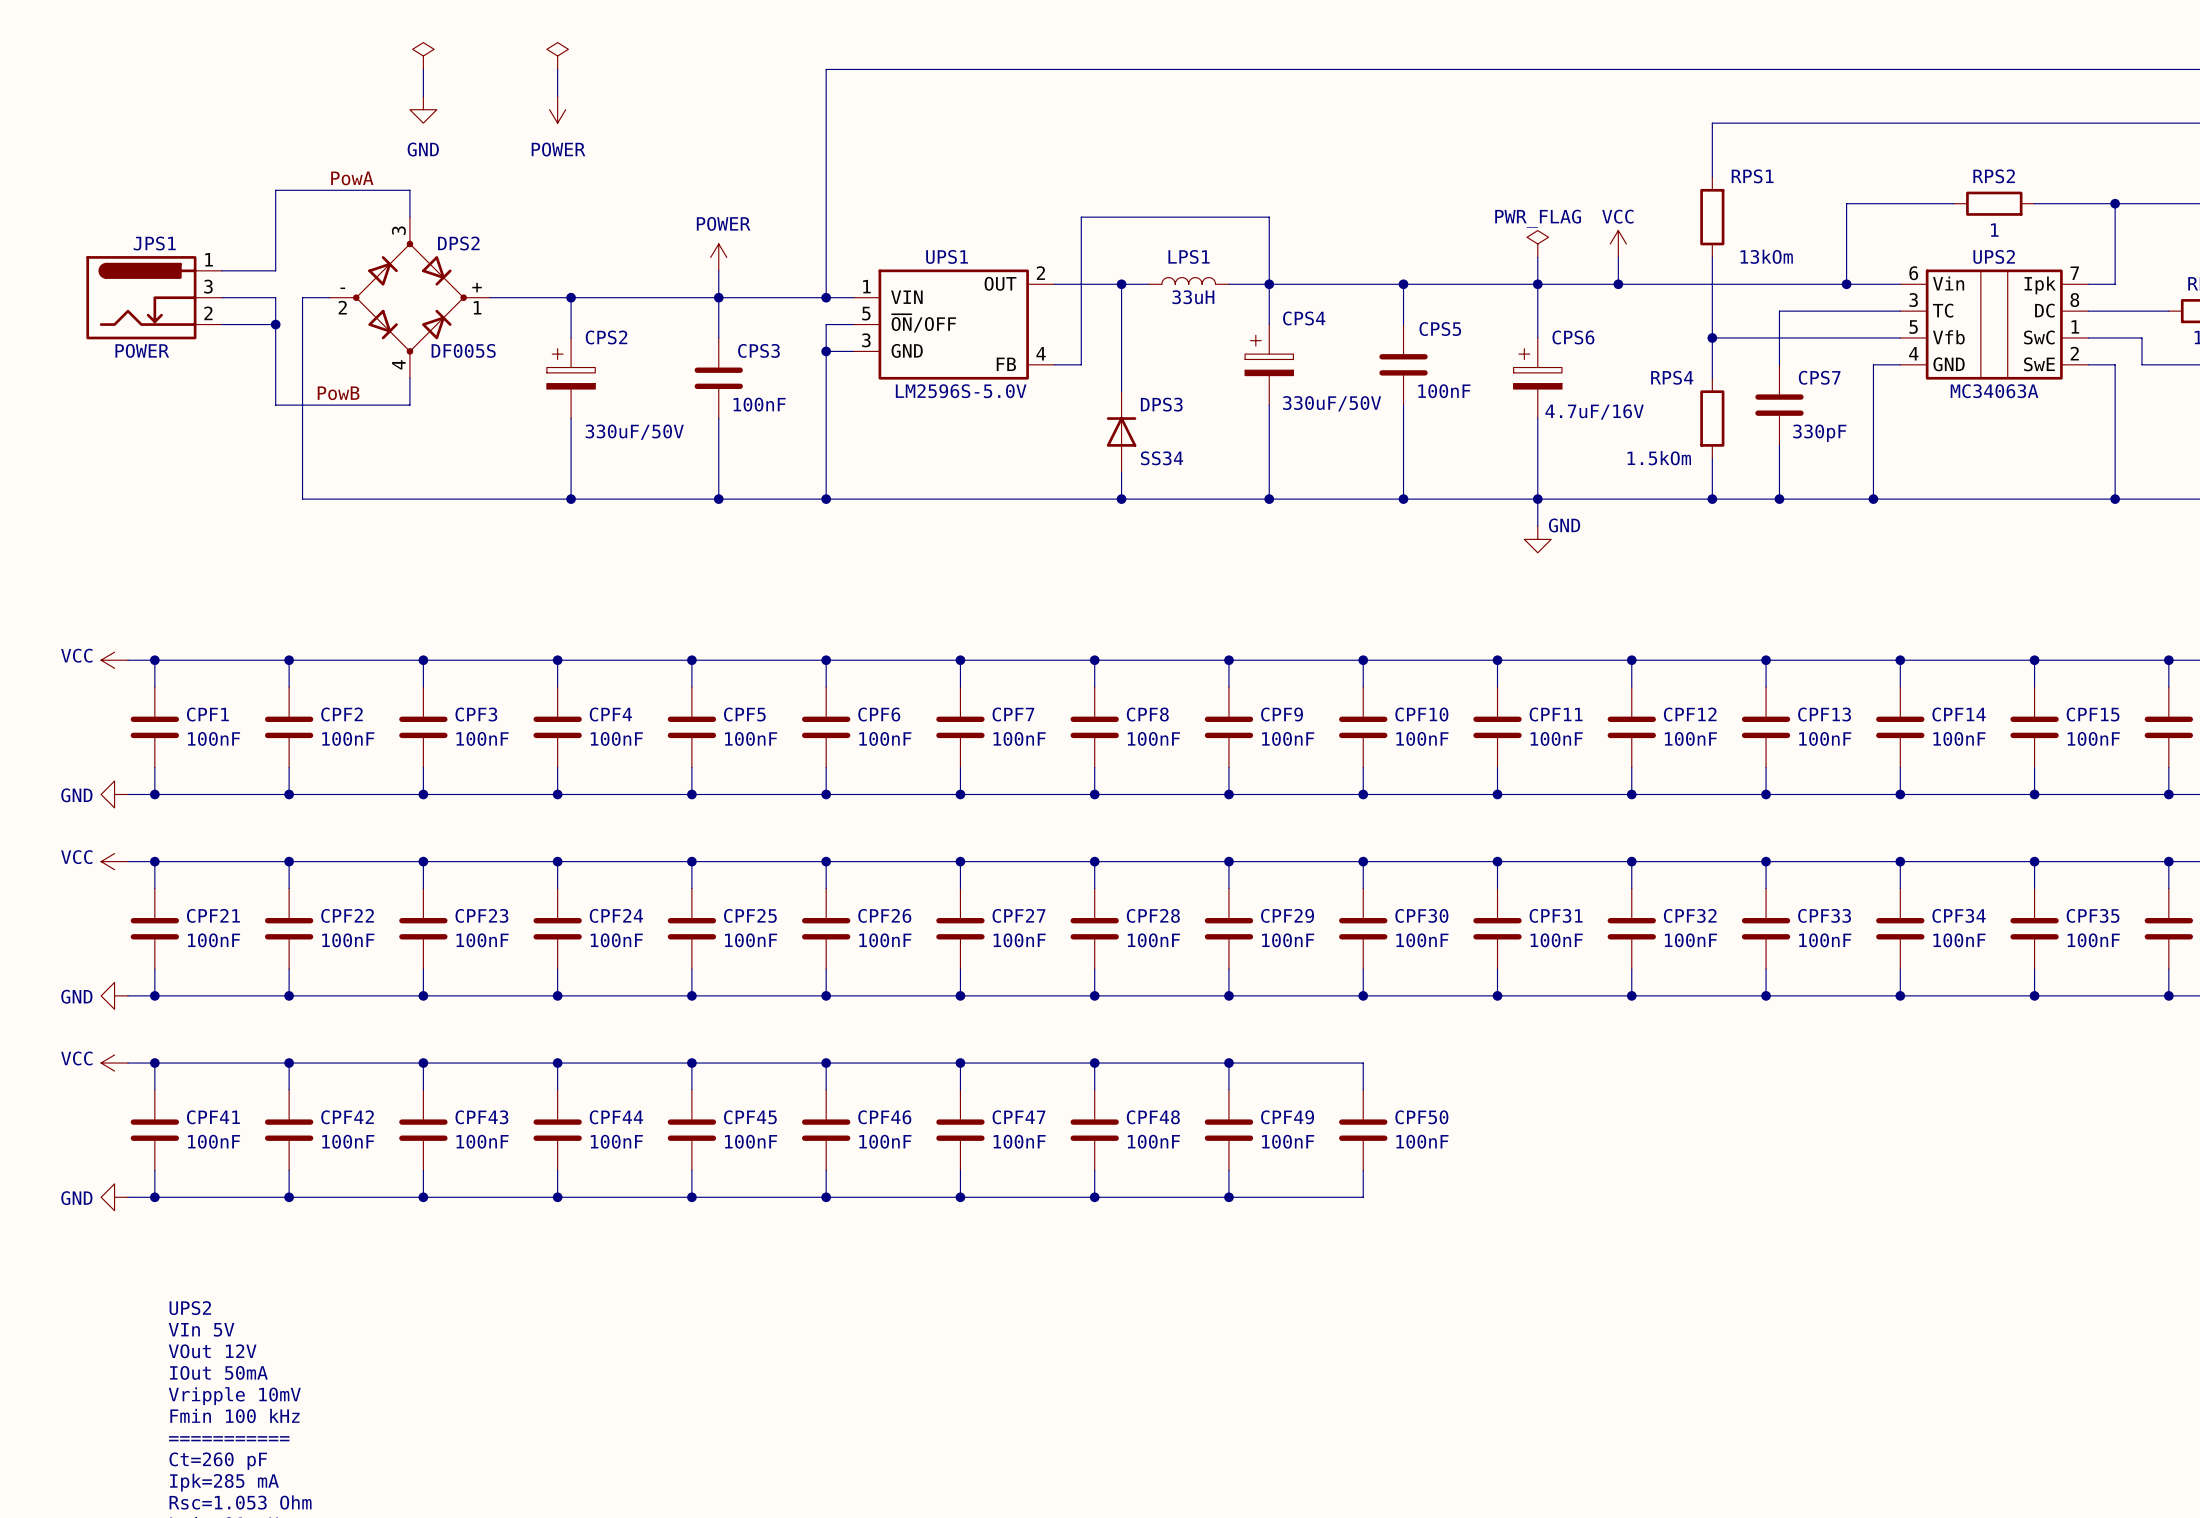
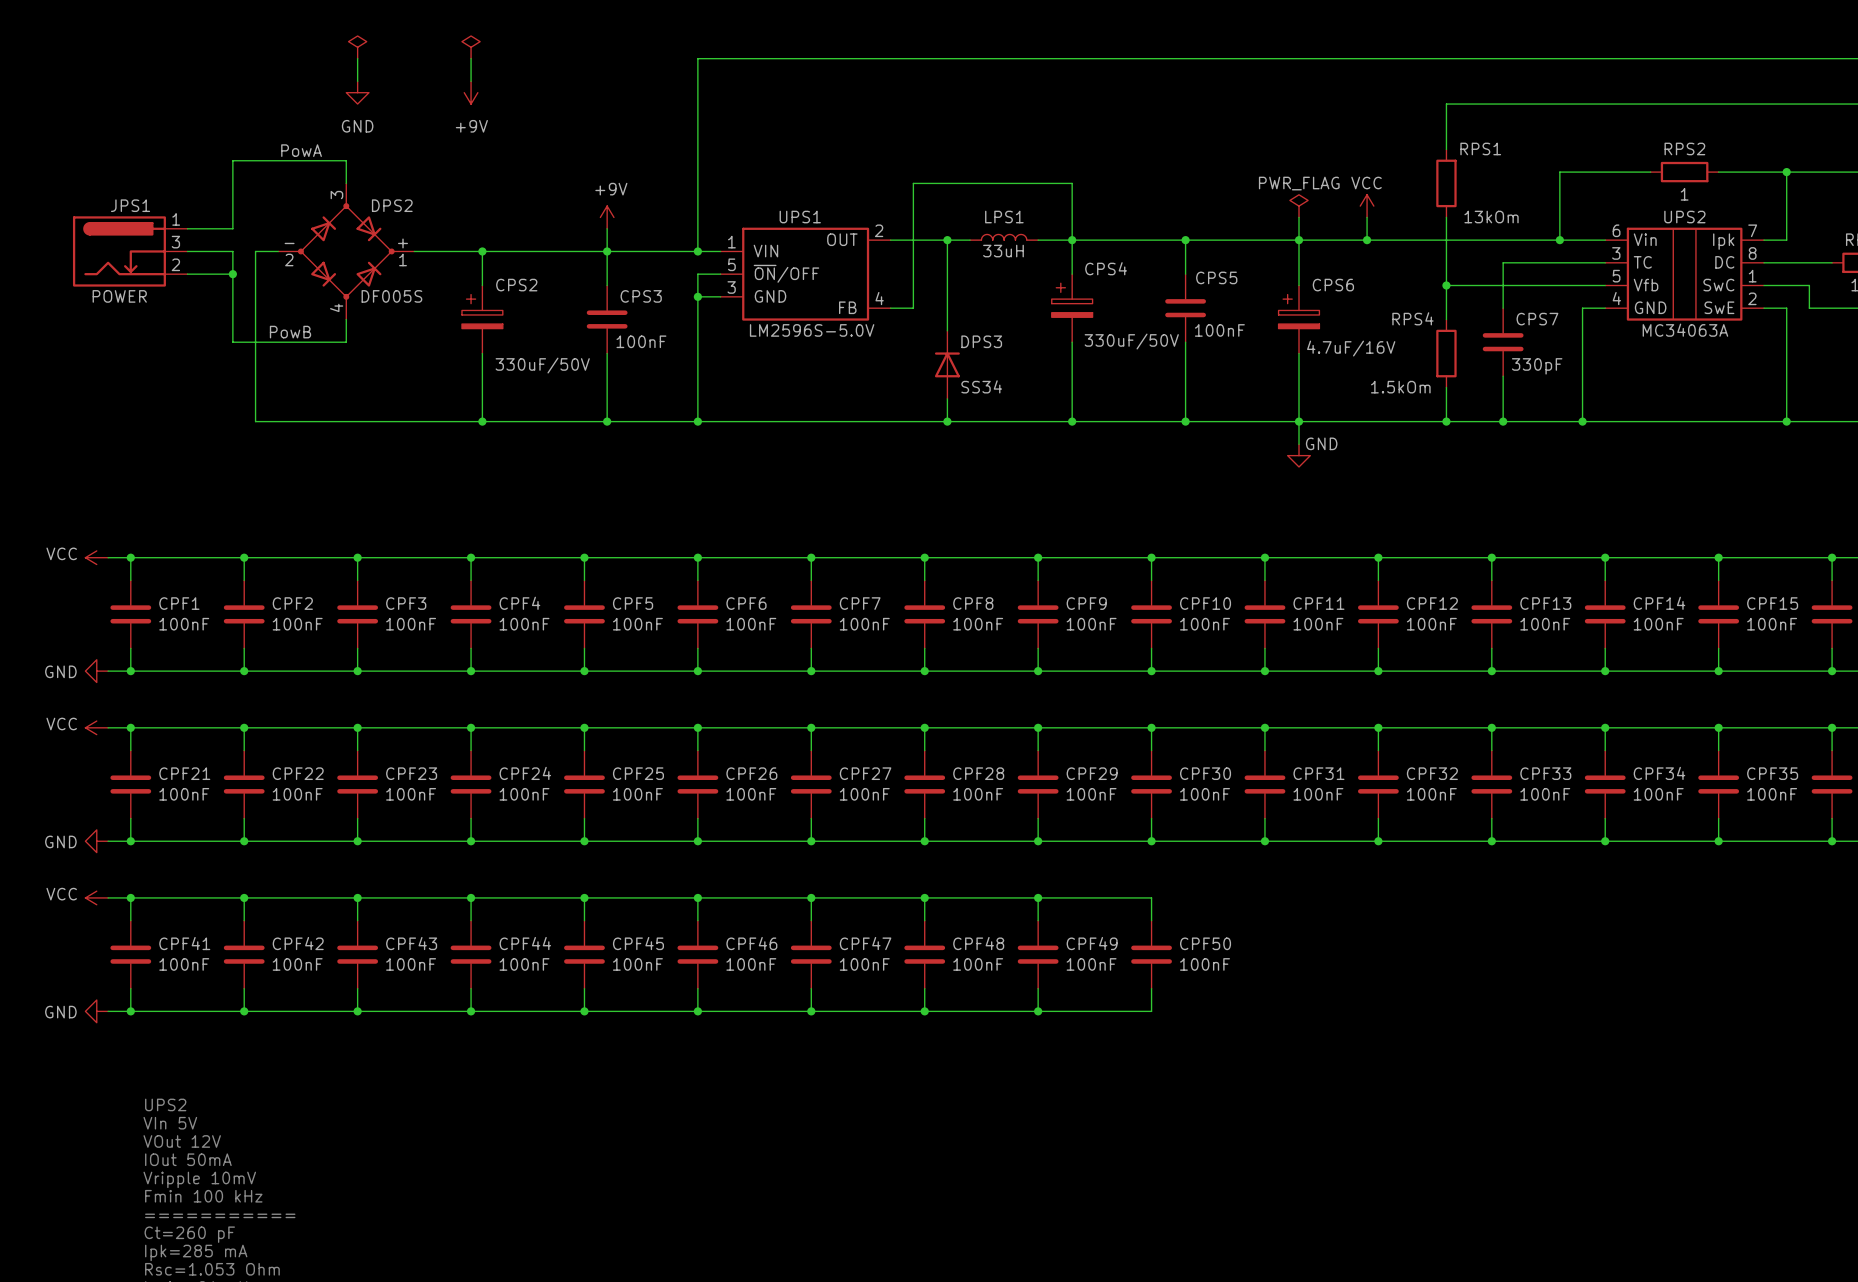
power symbol: POWER (557, 109) -> +9V (471, 92)
power symbol: POWER (718, 257) -> +9V (607, 217)

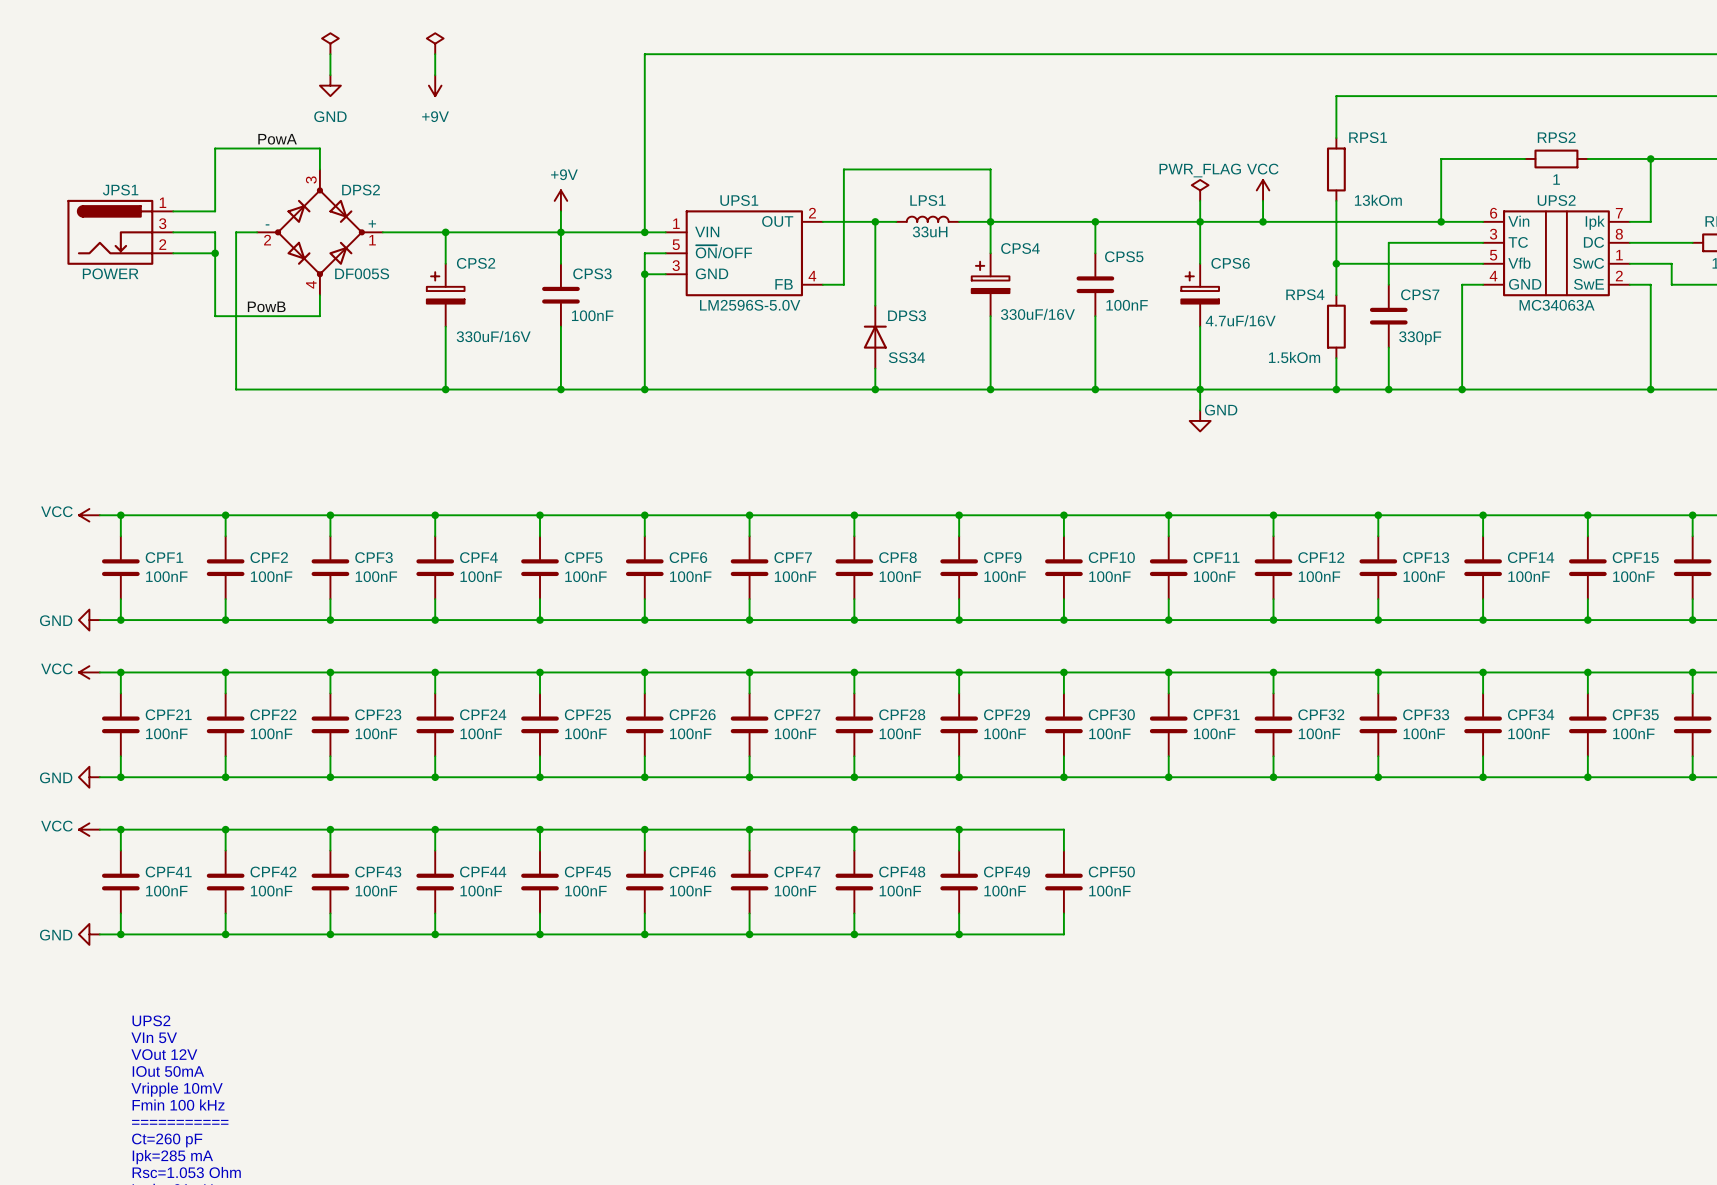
CPS4 value: 330uF/50V (1131, 341) -> 330uF/16V (1037, 314)
CPS2 value: 330uF/50V (542, 365) -> 330uF/16V (493, 336)

